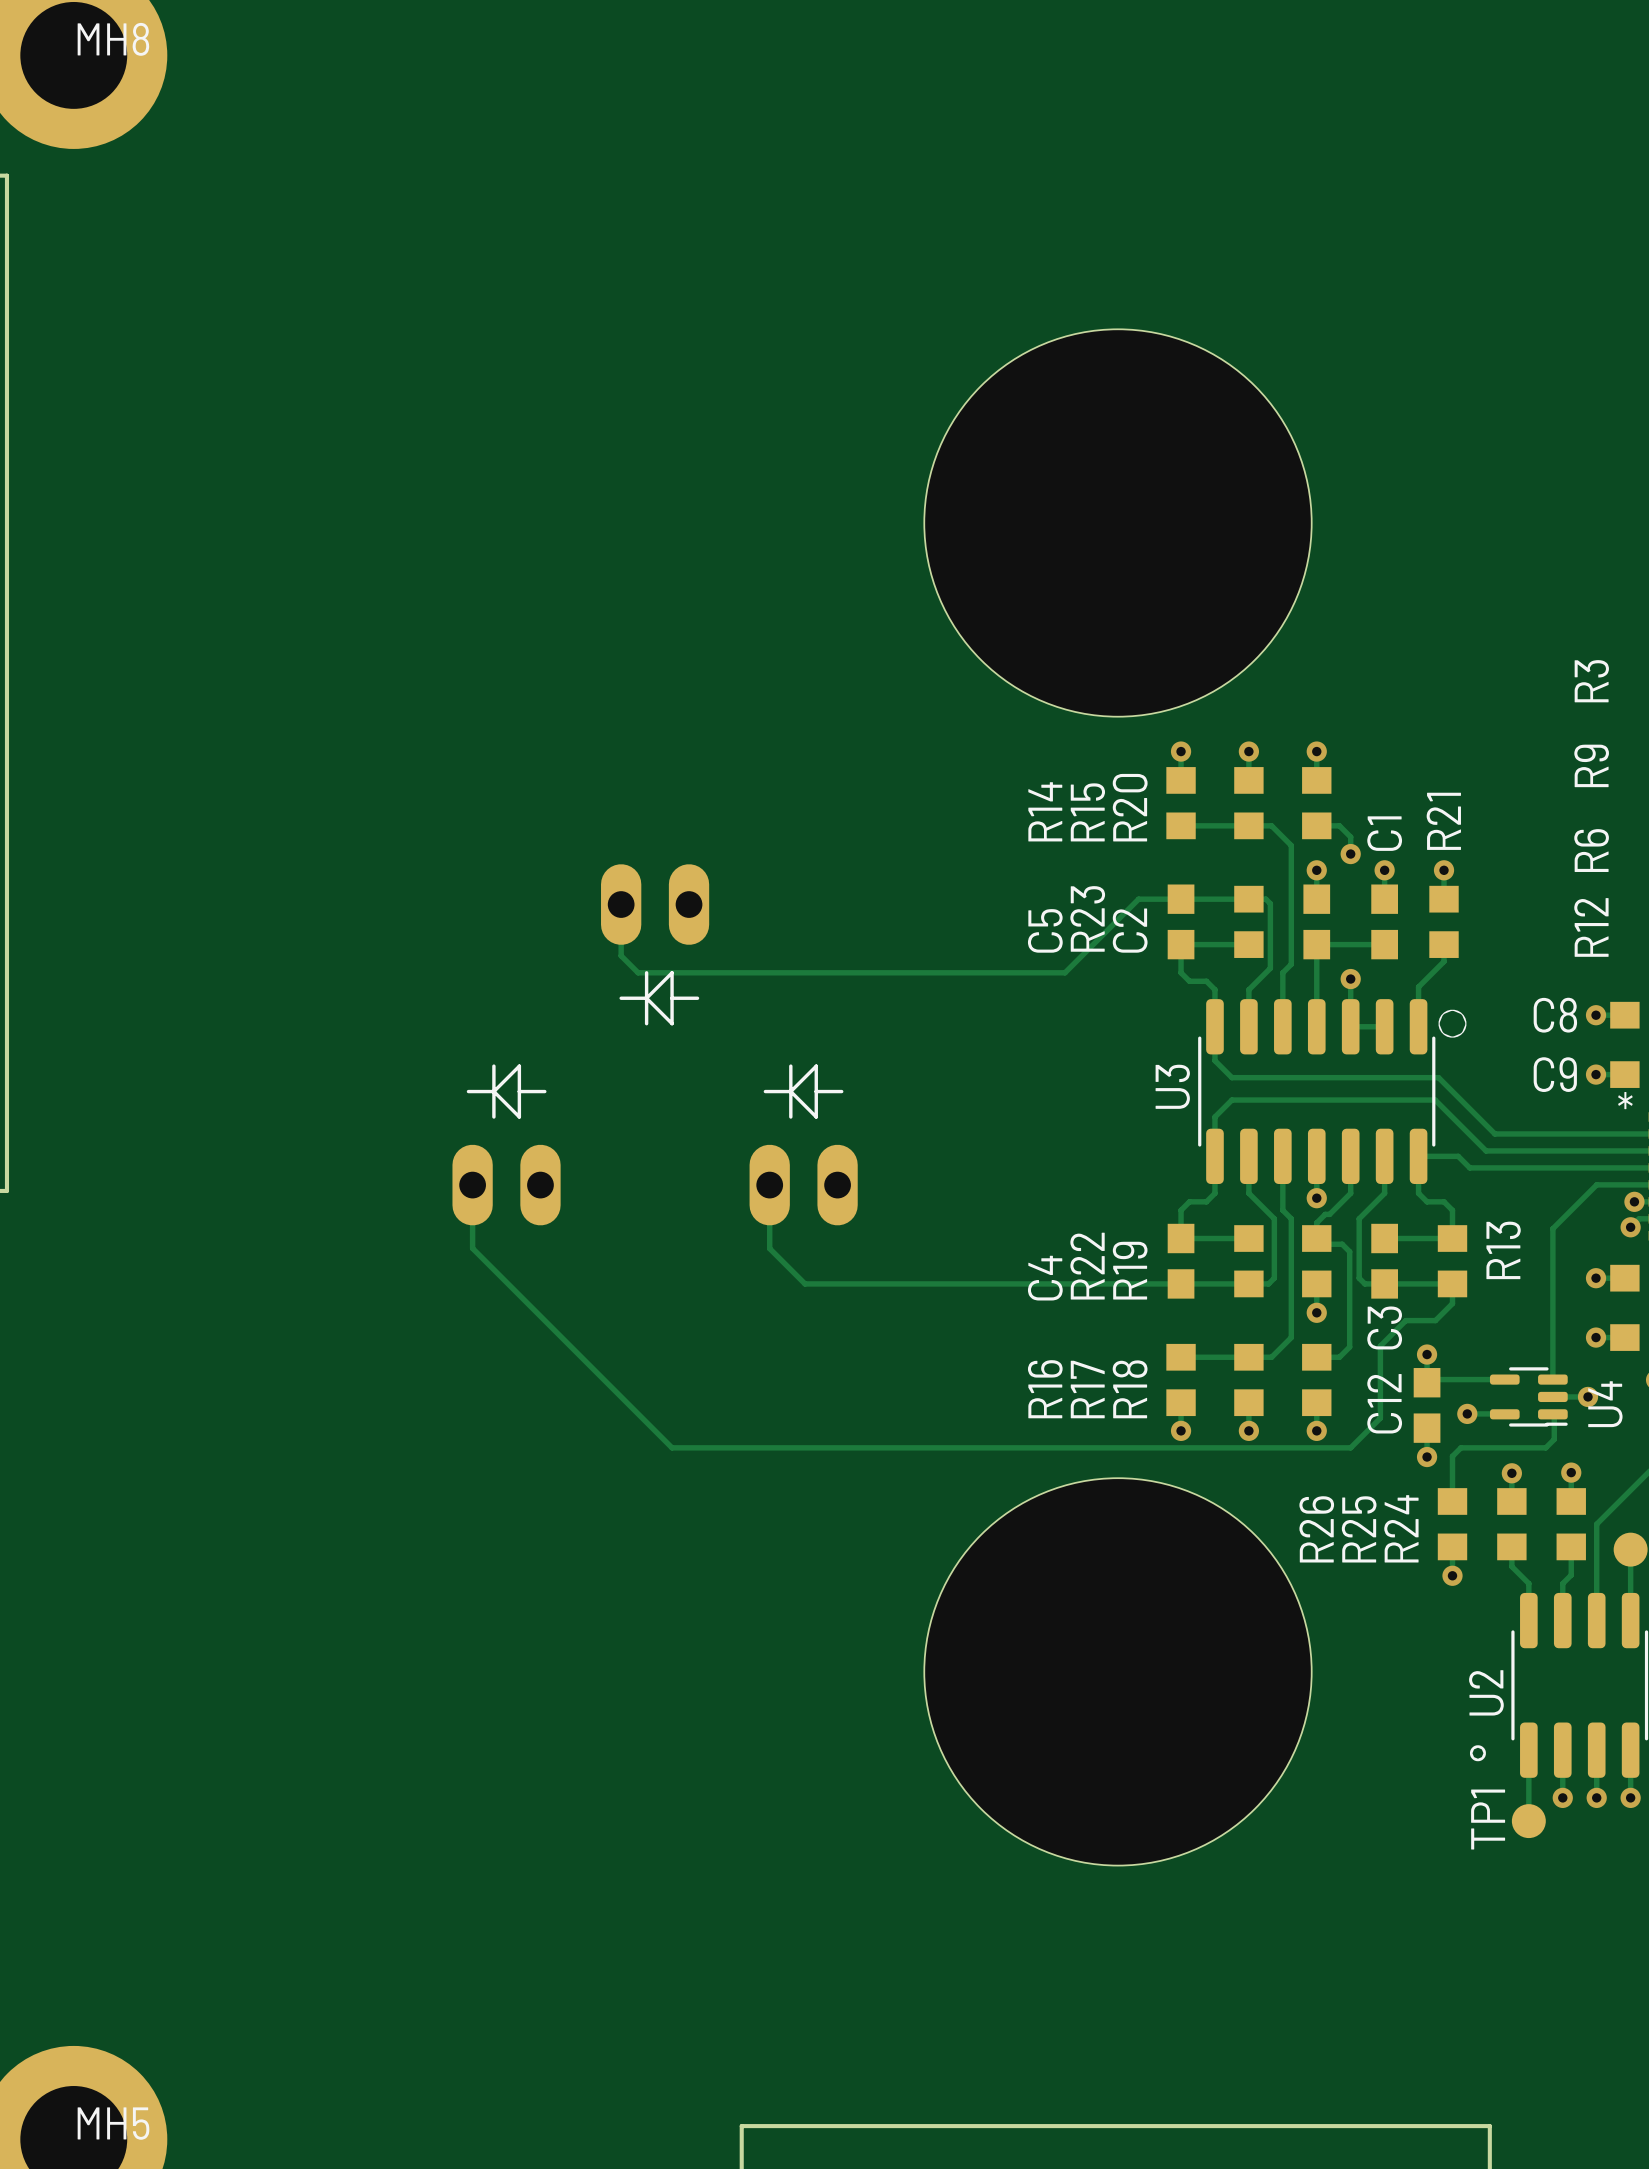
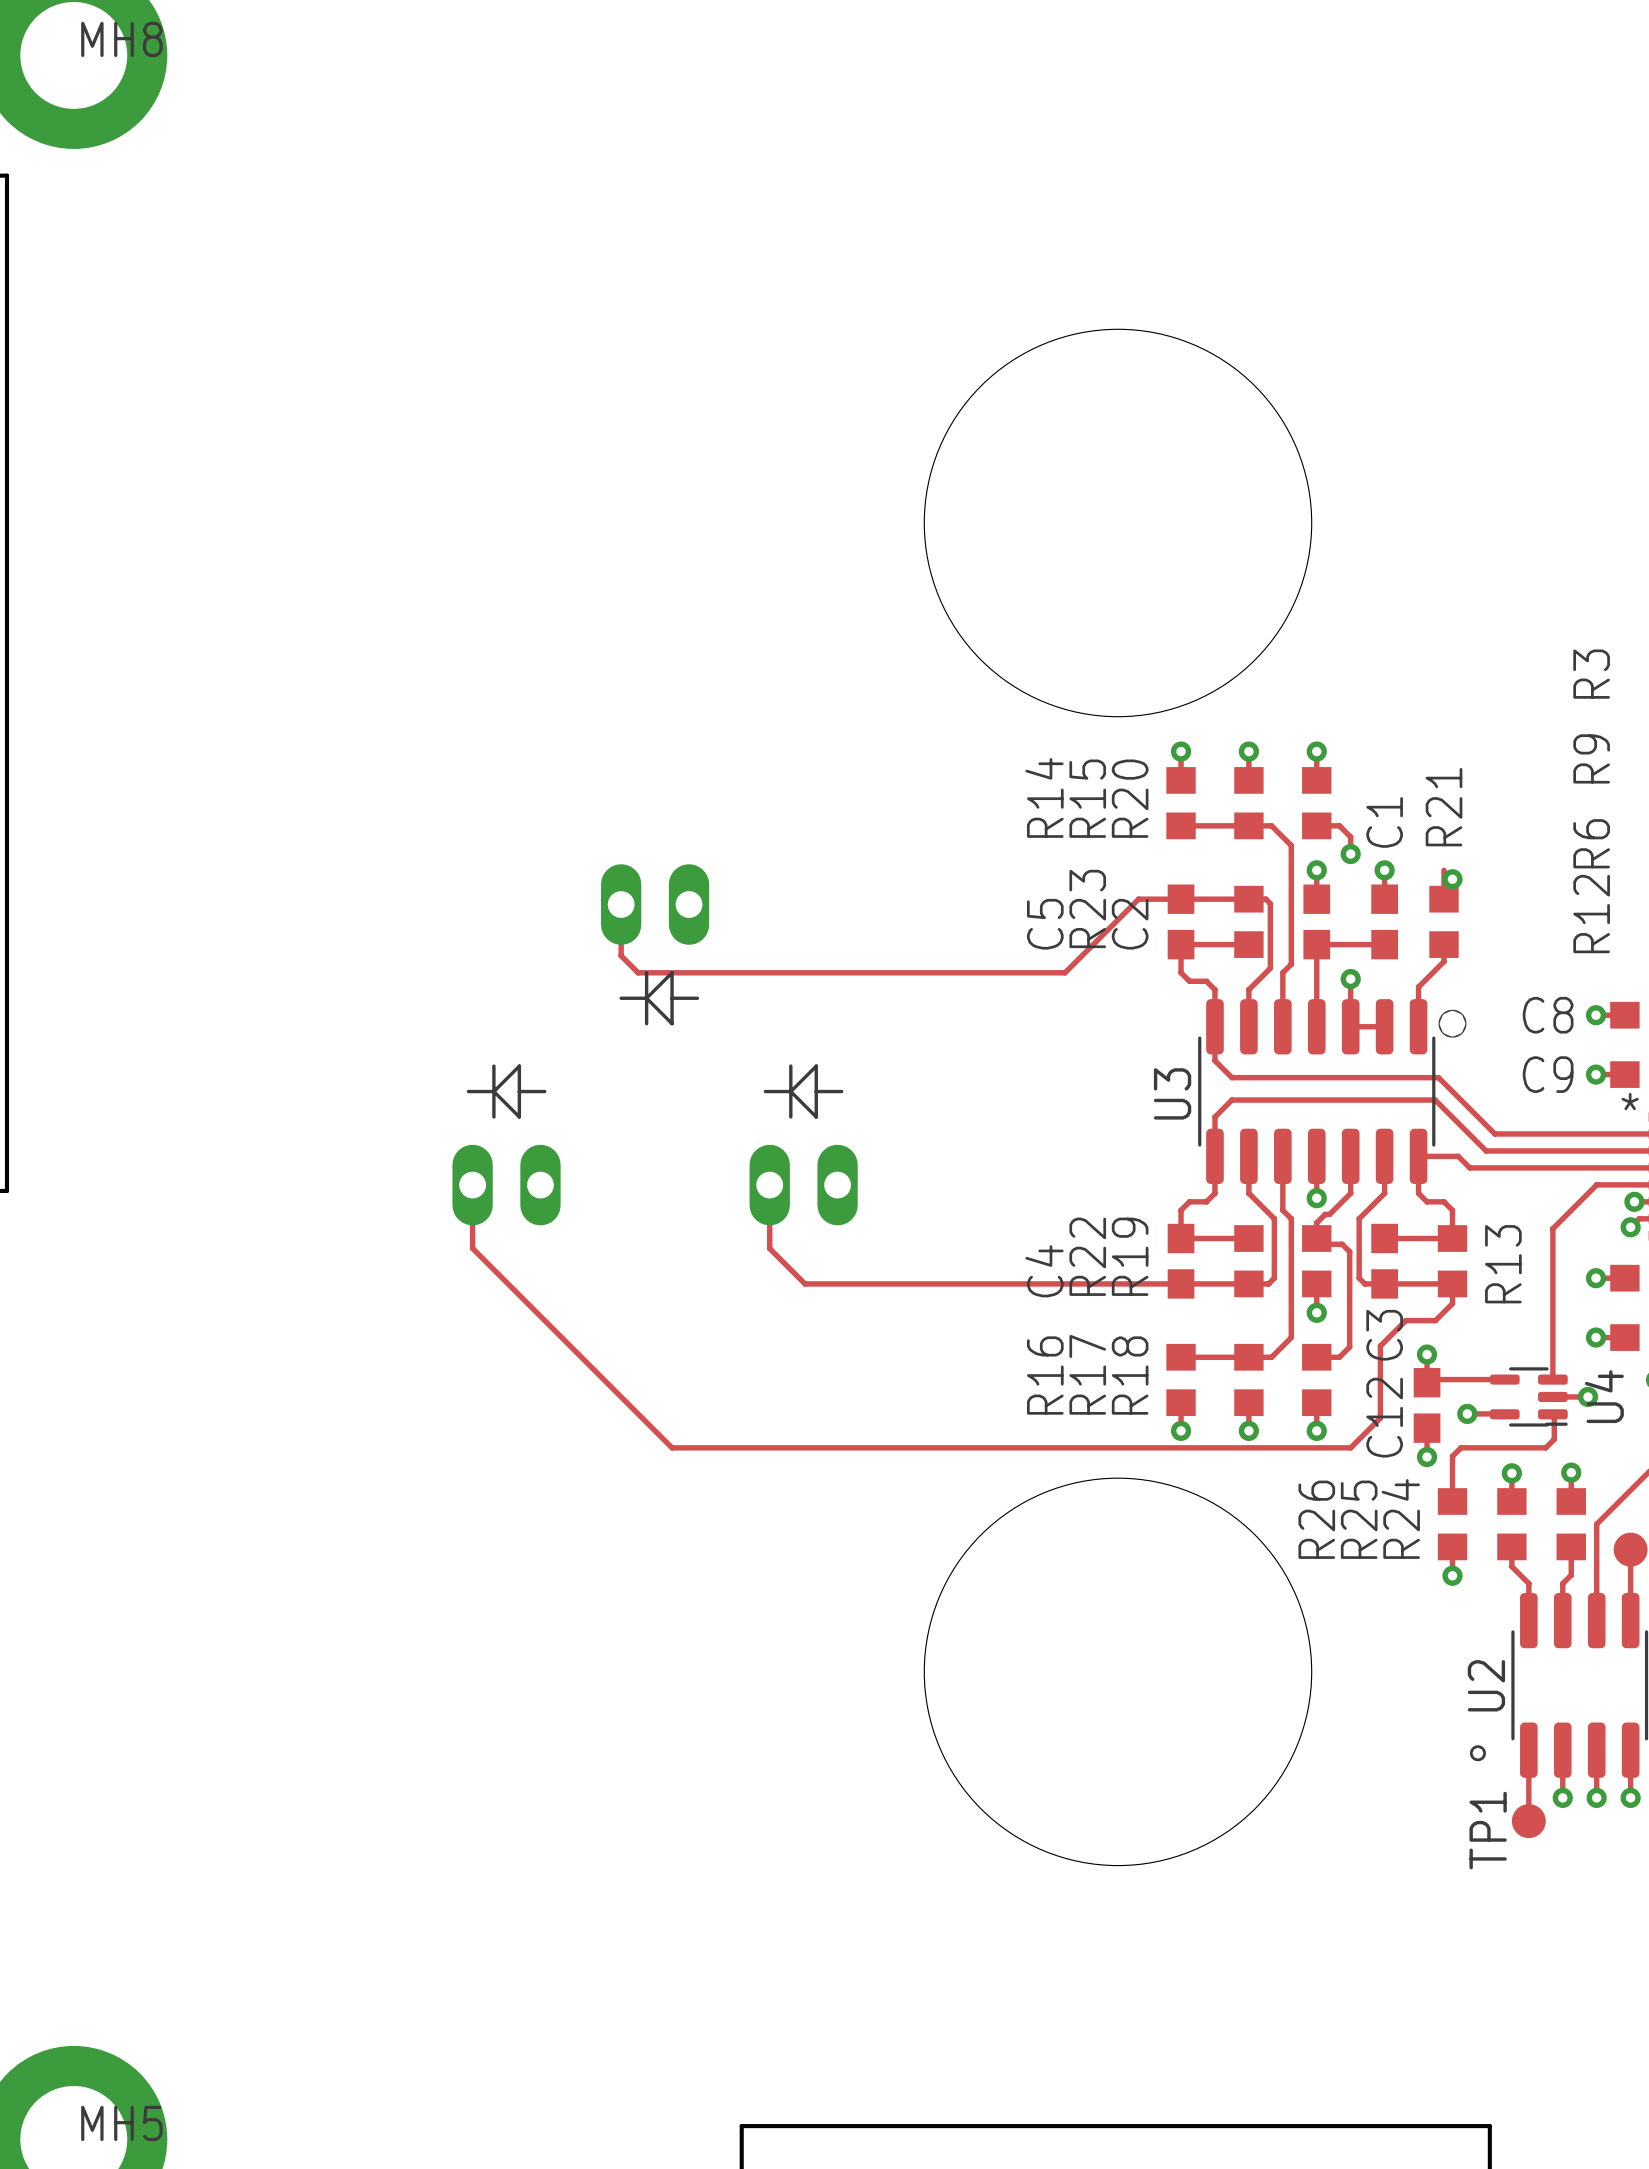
via position: (1444, 870) -> (1452, 879)

